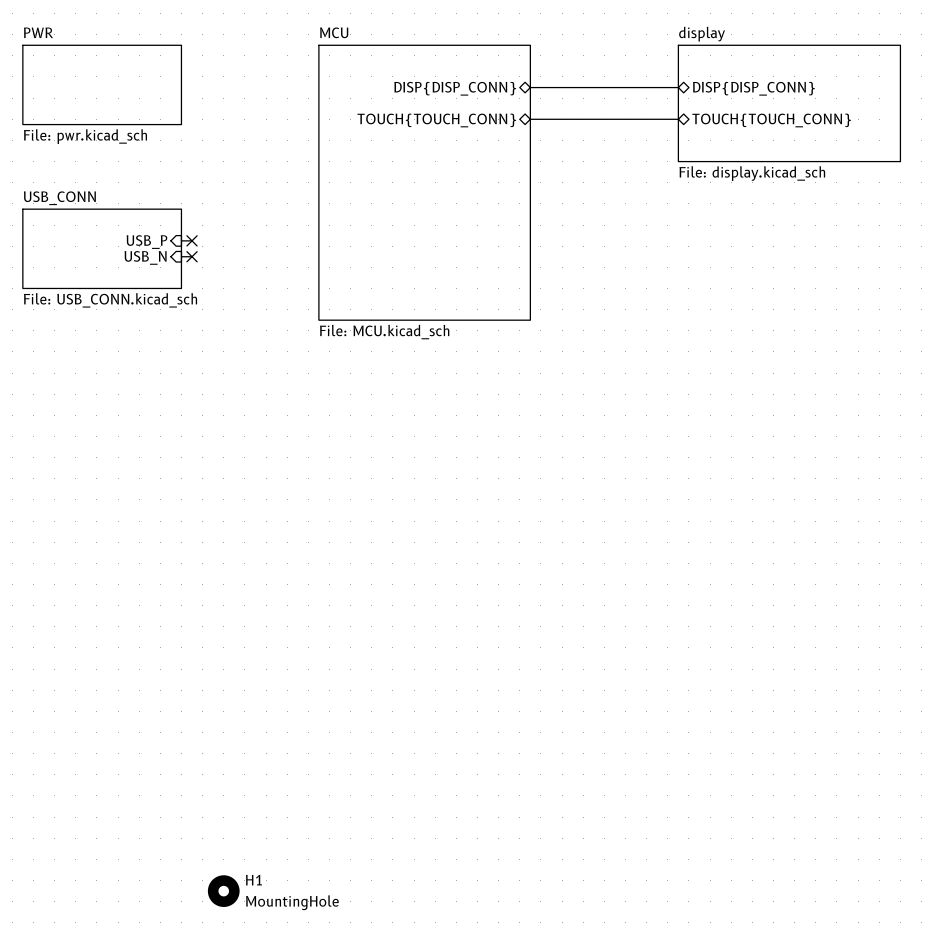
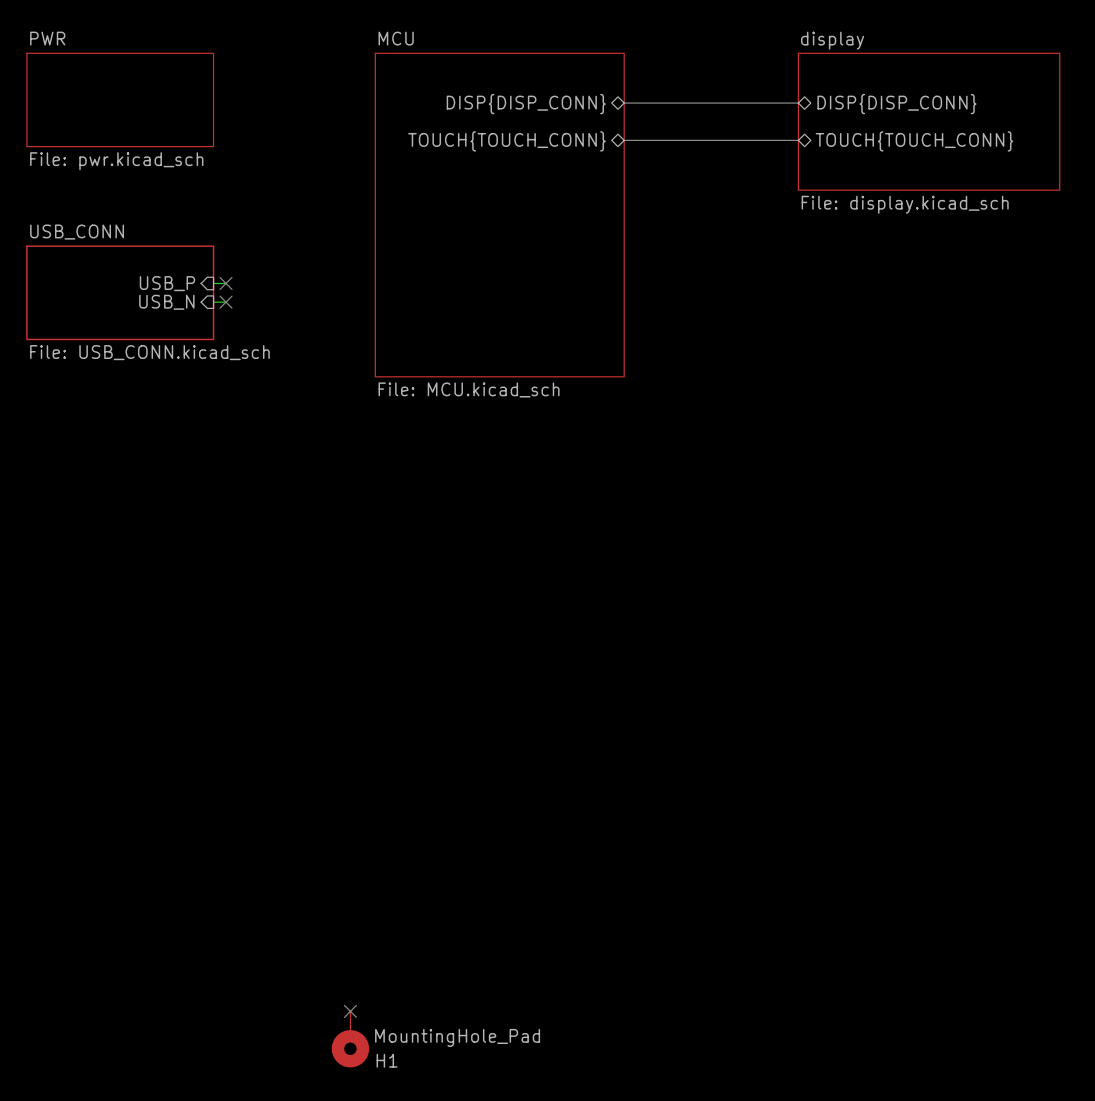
no-connect mark: none -> (350, 1011)
H1 symbol: [207, 875, 240, 907] -> [331, 1011, 370, 1068]
H1 name position: H1 (253, 880) -> H1 (387, 1060)
H1 value: MountingHole (292, 902) -> MountingHole_Pad (457, 1037)

